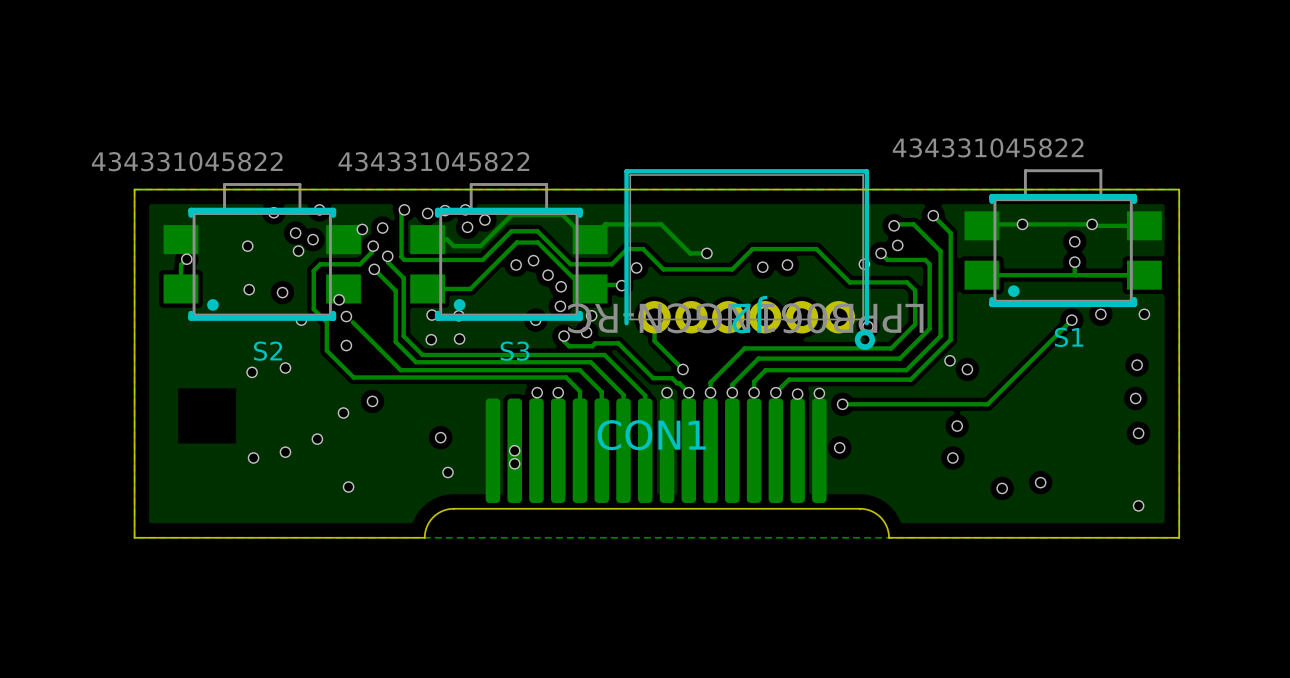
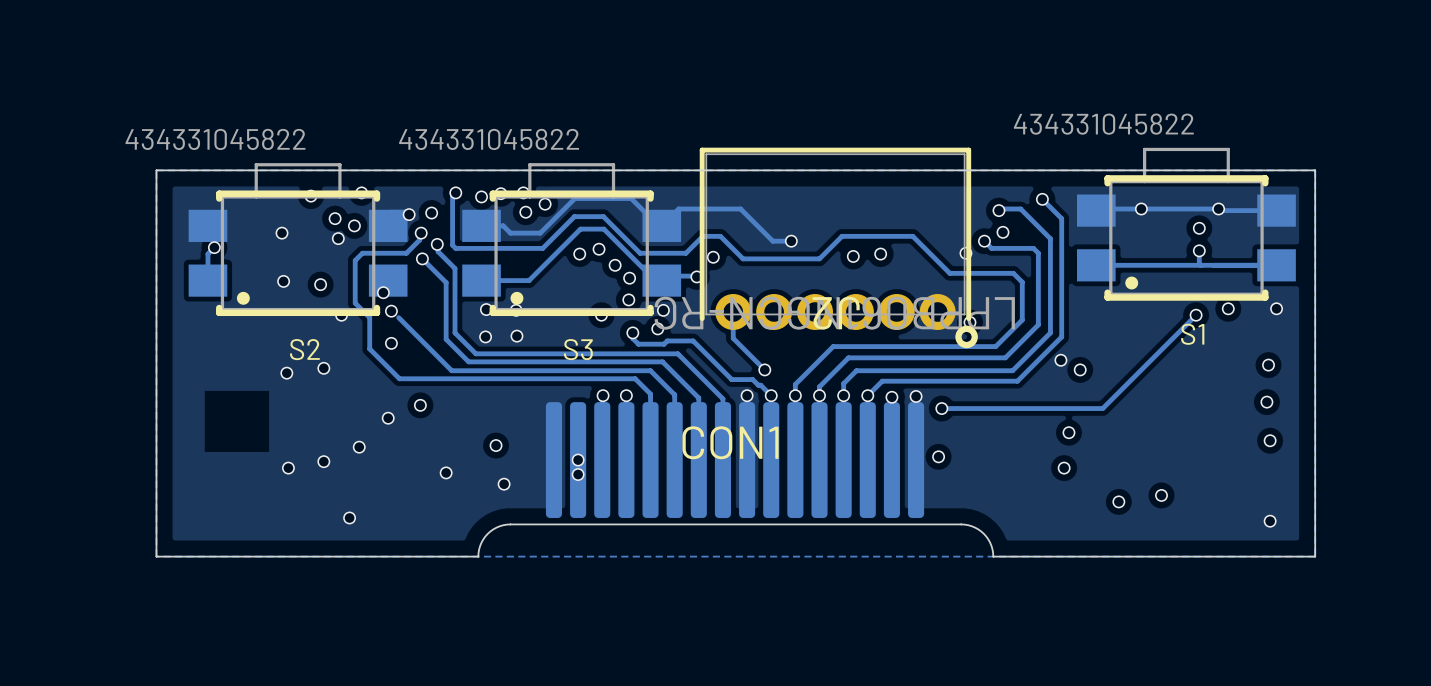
via: none -> (446, 472)
via: (348, 487) -> none
via: none -> (349, 517)

